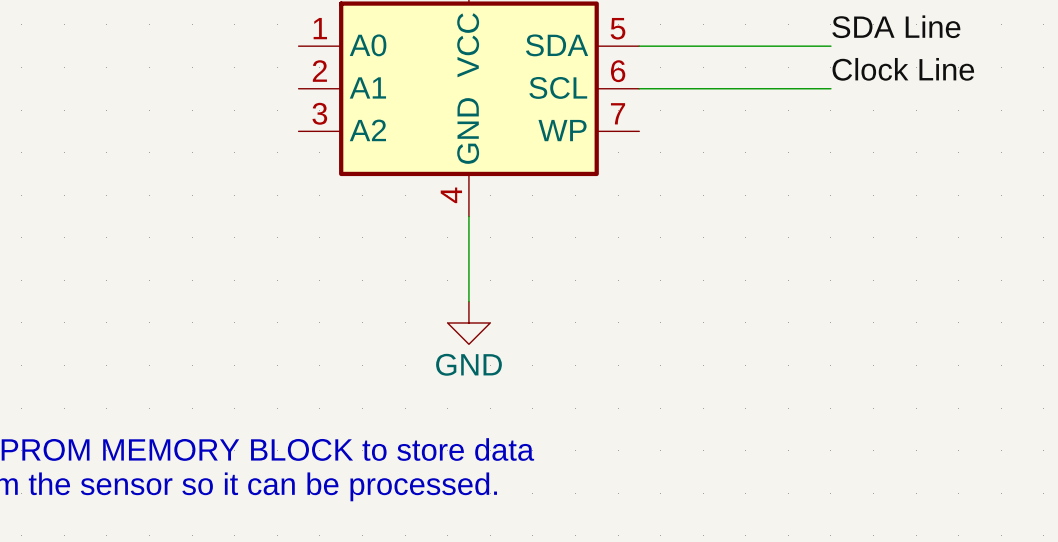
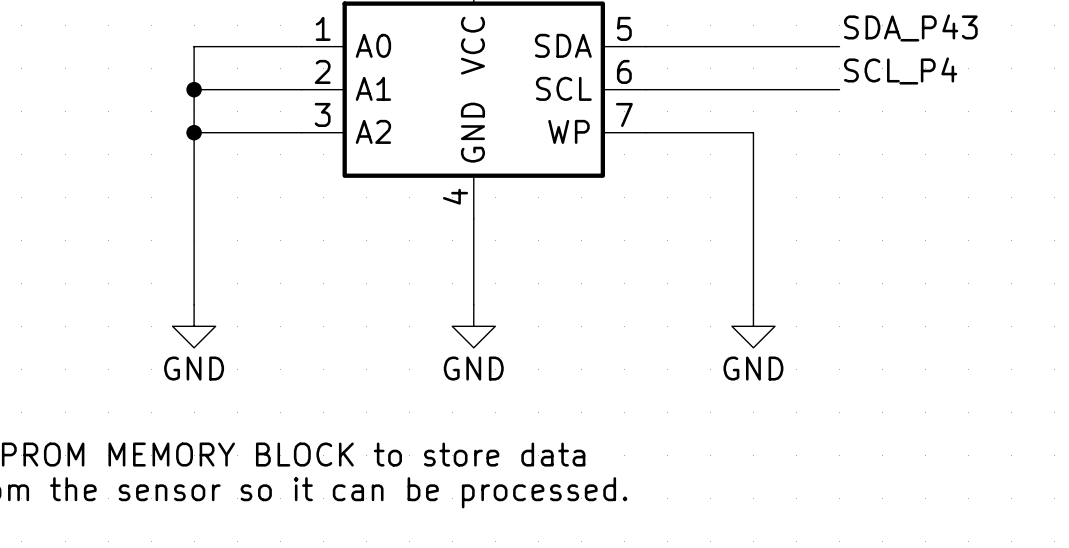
label: SDA Line (896, 26) -> SDA_P43 (910, 27)
wire: none -> (301, 46) (194, 46) (194, 304)
label: Clock Line (903, 69) -> SCL_P4 (900, 70)
wire: none -> (194, 89) (301, 89)
junction: none -> (194, 89)
wire: none -> (194, 132) (301, 132)
junction: none -> (194, 132)
wire: none -> (645, 132) (753, 132) (753, 304)
power symbol: none -> GND (194, 326)
power symbol: none -> GND (753, 326)

